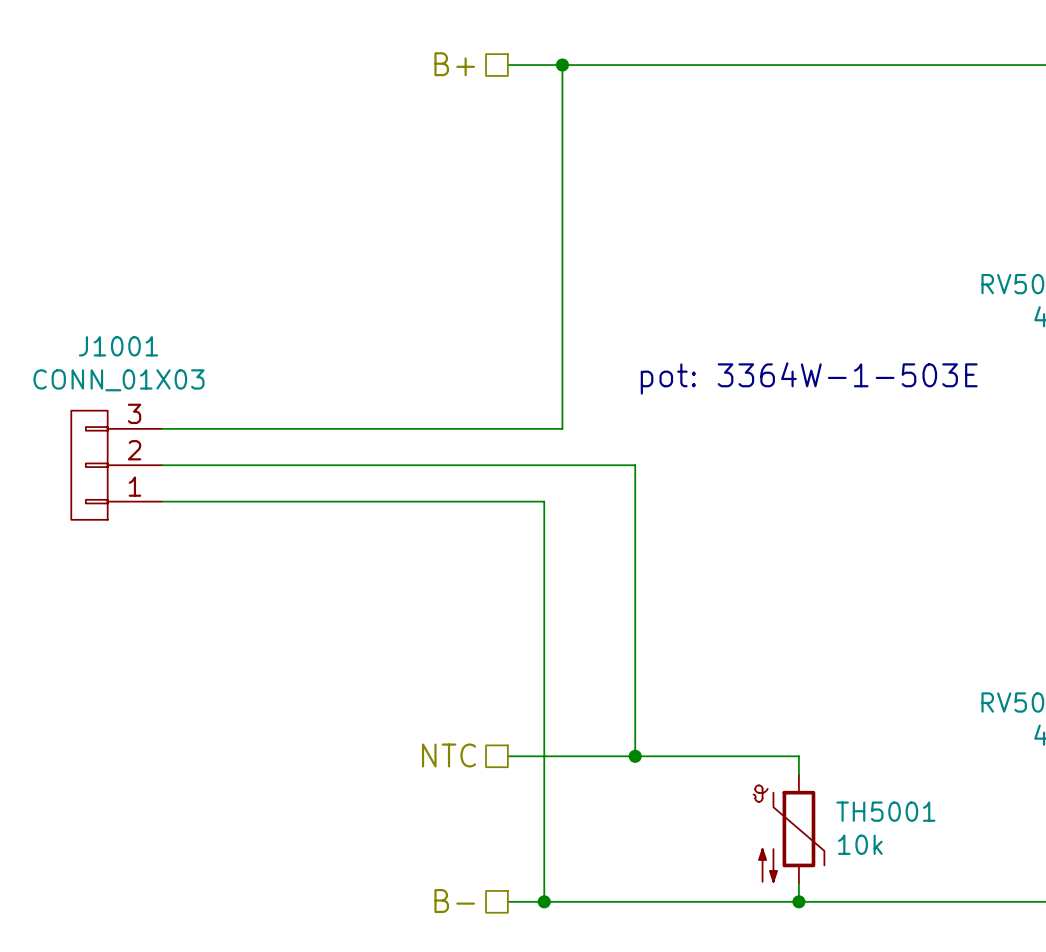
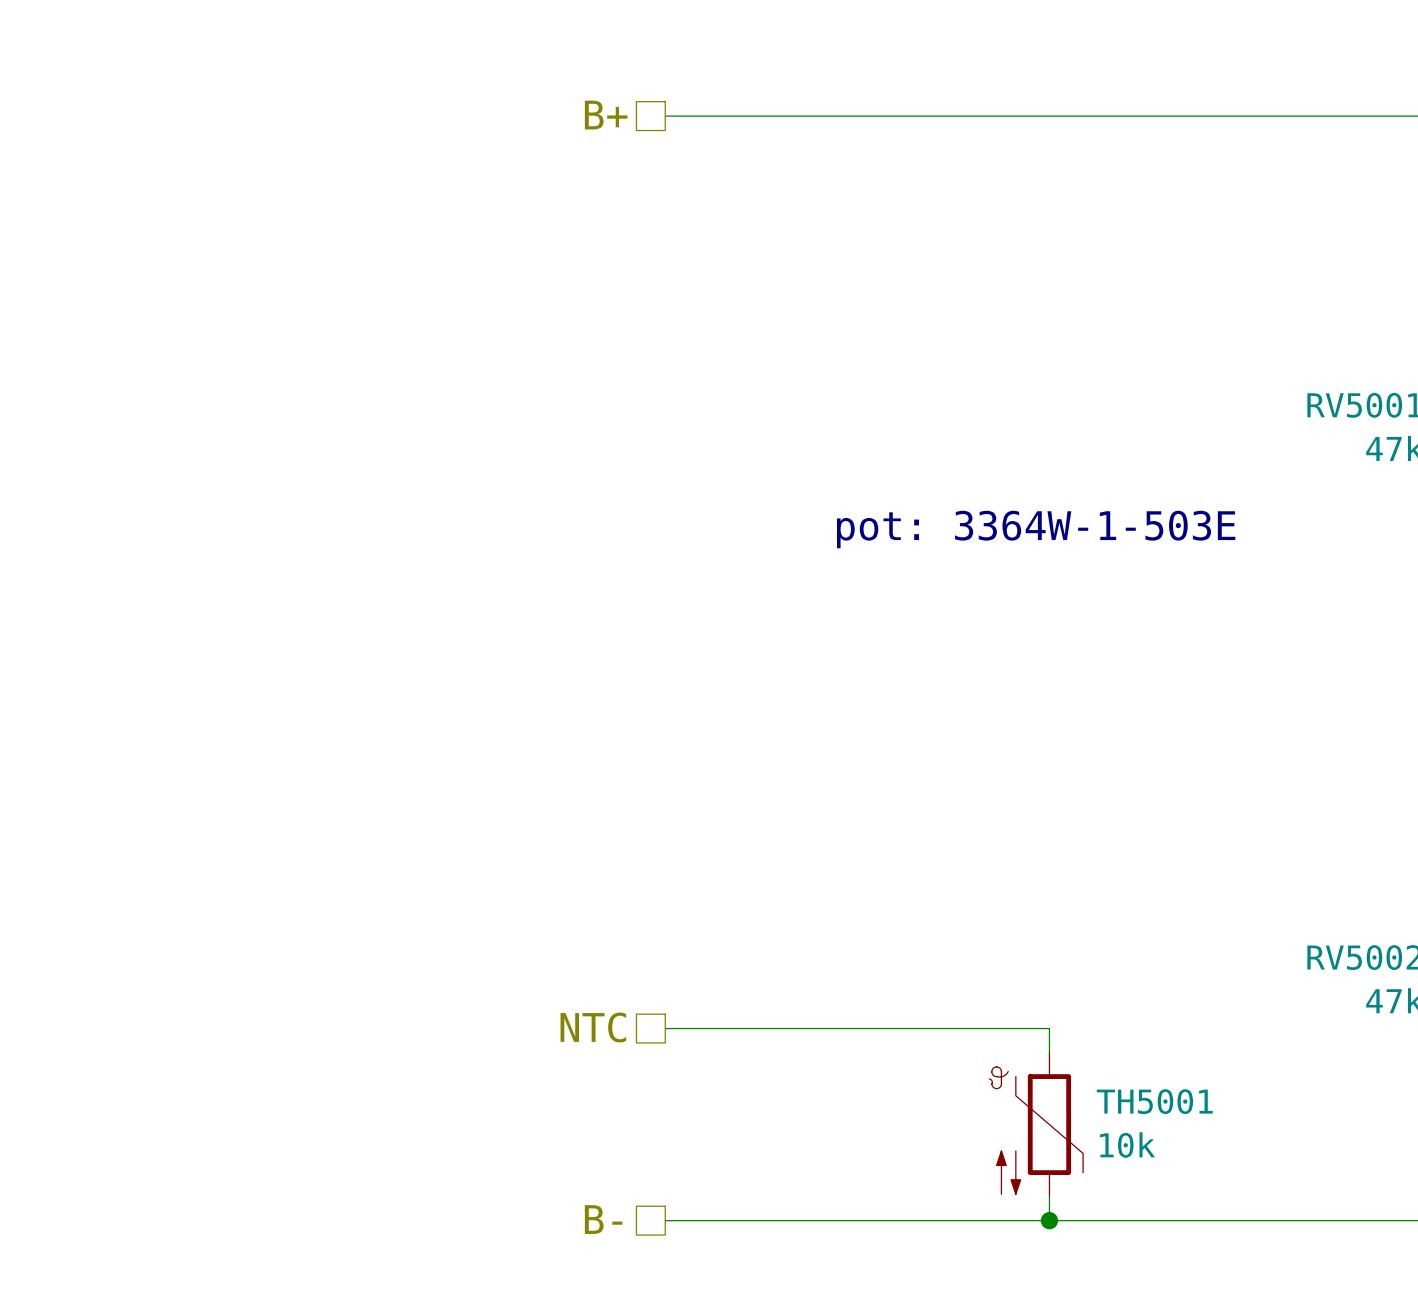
wire: (562, 65) (562, 428) (162, 428) -> none
junction: (562, 65) -> none
J1001: CONN_01X03 (116, 465) -> none
wire: (162, 465) (635, 465) (635, 756) -> none
wire: (162, 501) (544, 501) (544, 901) -> none
junction: (635, 756) -> none
junction: (544, 901) -> none

